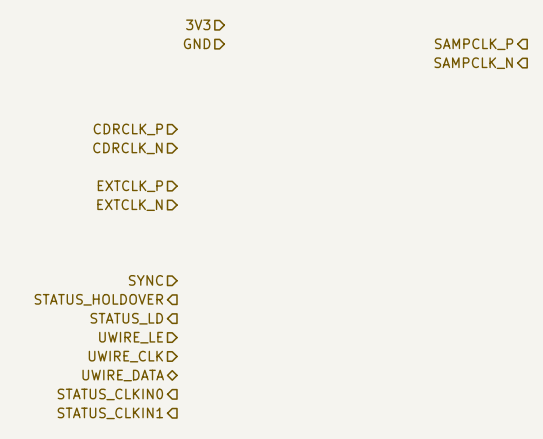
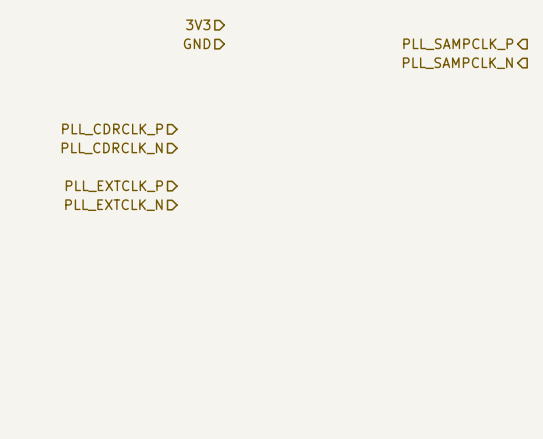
hierarchical label: SAMPCLK_P (474, 44) -> PLL_SAMPCLK_P (458, 44)
hierarchical label: SAMPCLK_N (473, 63) -> PLL_SAMPCLK_N (457, 63)
hierarchical label: CDRCLK_P (128, 129) -> PLL_CDRCLK_P (112, 129)
hierarchical label: CDRCLK_N (127, 148) -> PLL_CDRCLK_N (112, 148)
hierarchical label: EXTCLK_P (130, 186) -> PLL_EXTCLK_P (114, 186)
hierarchical label: EXTCLK_N (129, 205) -> PLL_EXTCLK_N (113, 205)
hierarchical label: SYNC (145, 280) -> none
hierarchical label: STATUS_HOLDOVER (98, 299) -> none
hierarchical label: STATUS_LD (126, 318) -> none
hierarchical label: UWIRE_LE (131, 337) -> none
hierarchical label: UWIRE_CLK (125, 356) -> none
hierarchical label: UWIRE_DATA (123, 375) -> none
hierarchical label: STATUS_CLKIN0 (110, 394) -> none
hierarchical label: STATUS_CLKIN1 (110, 413) -> none

